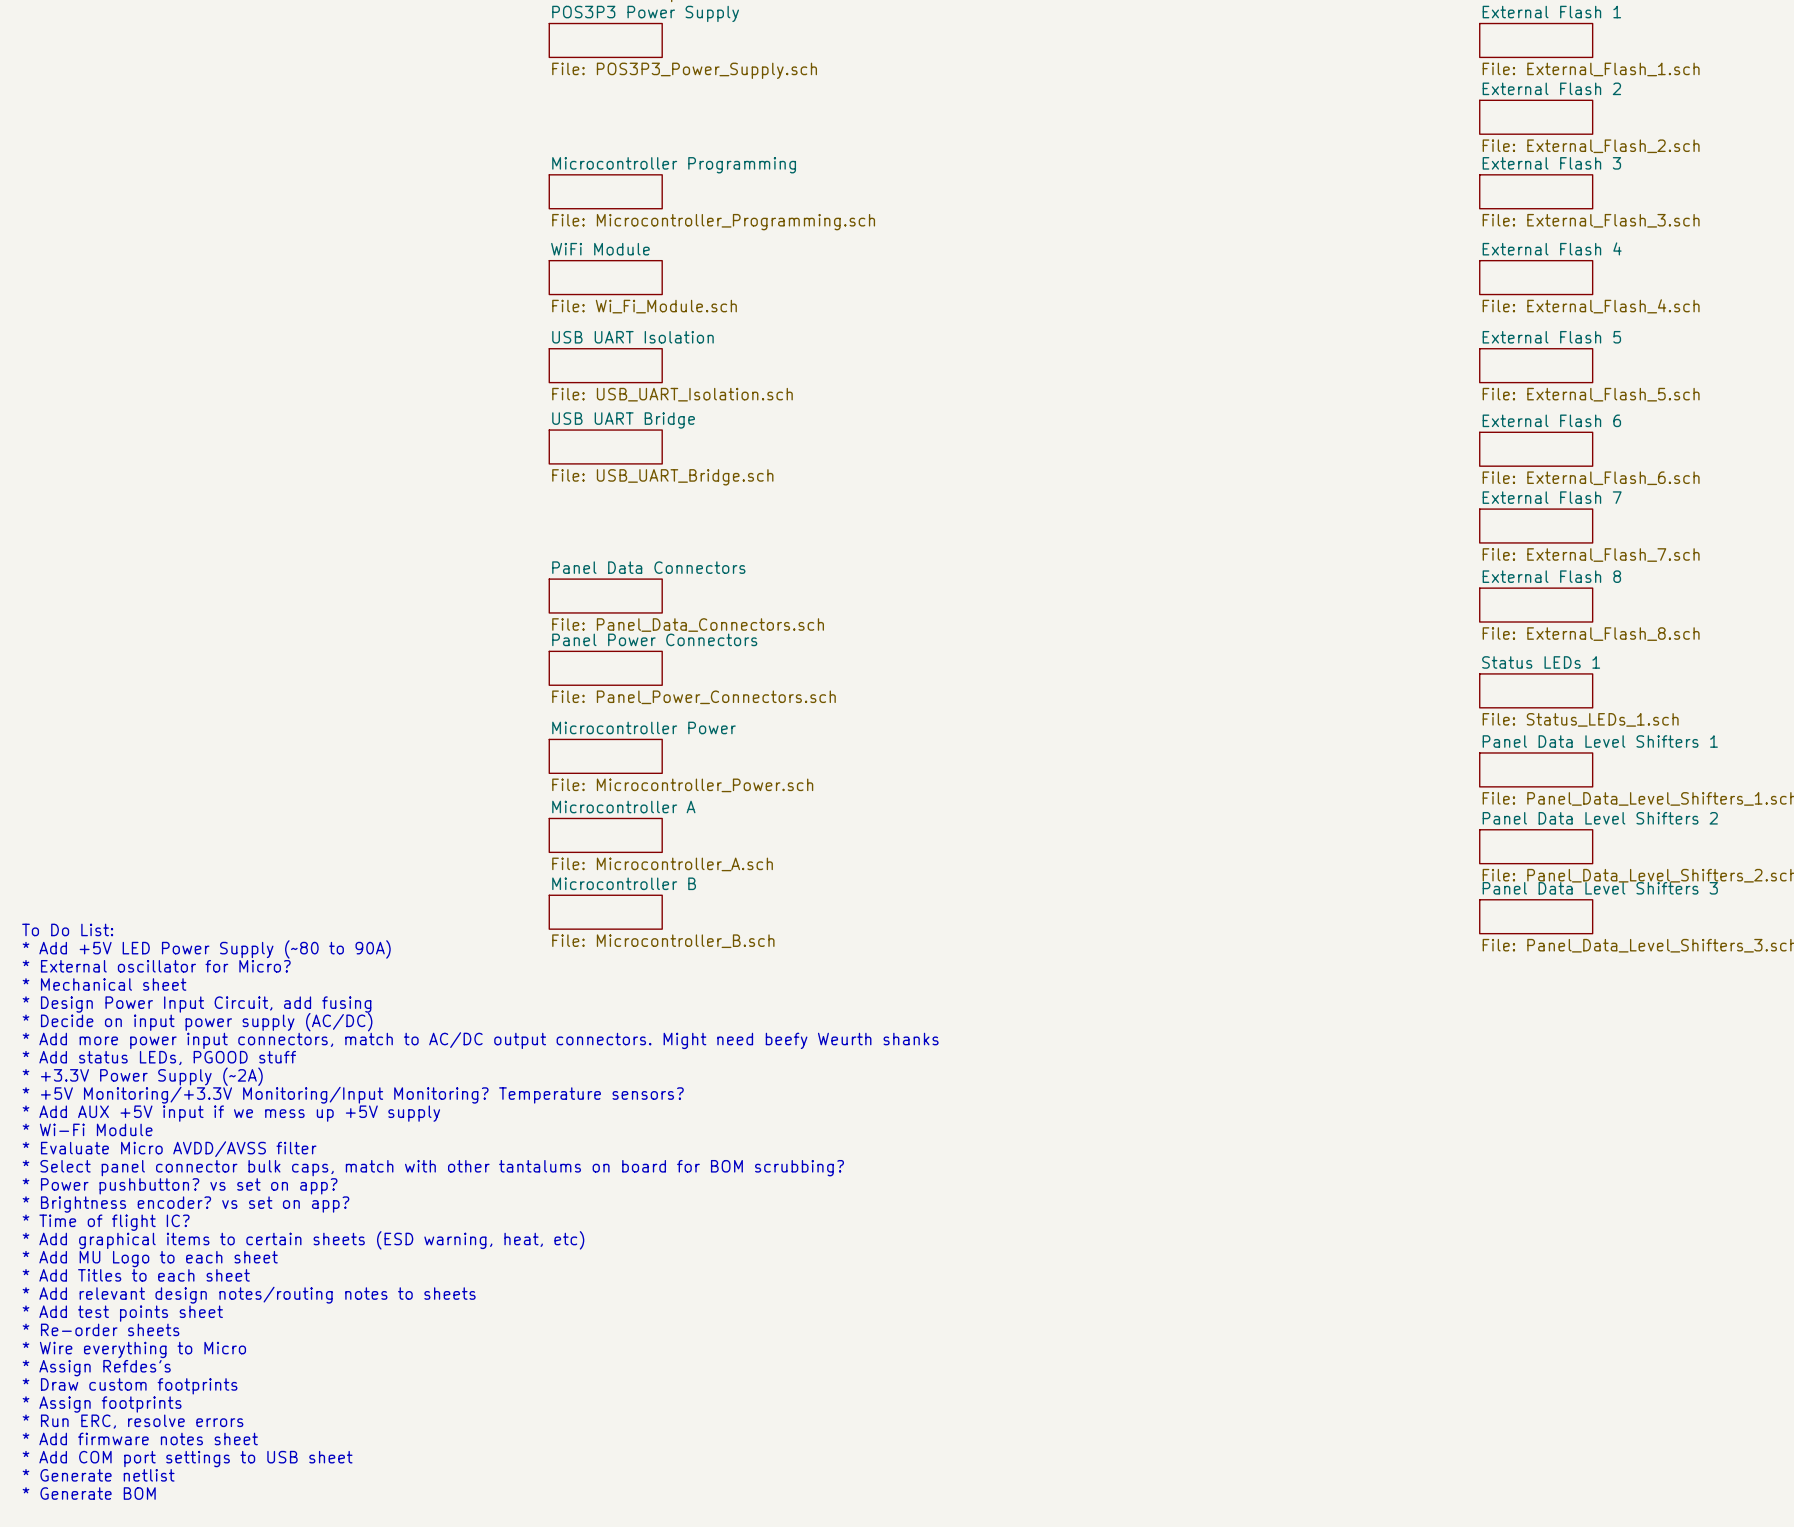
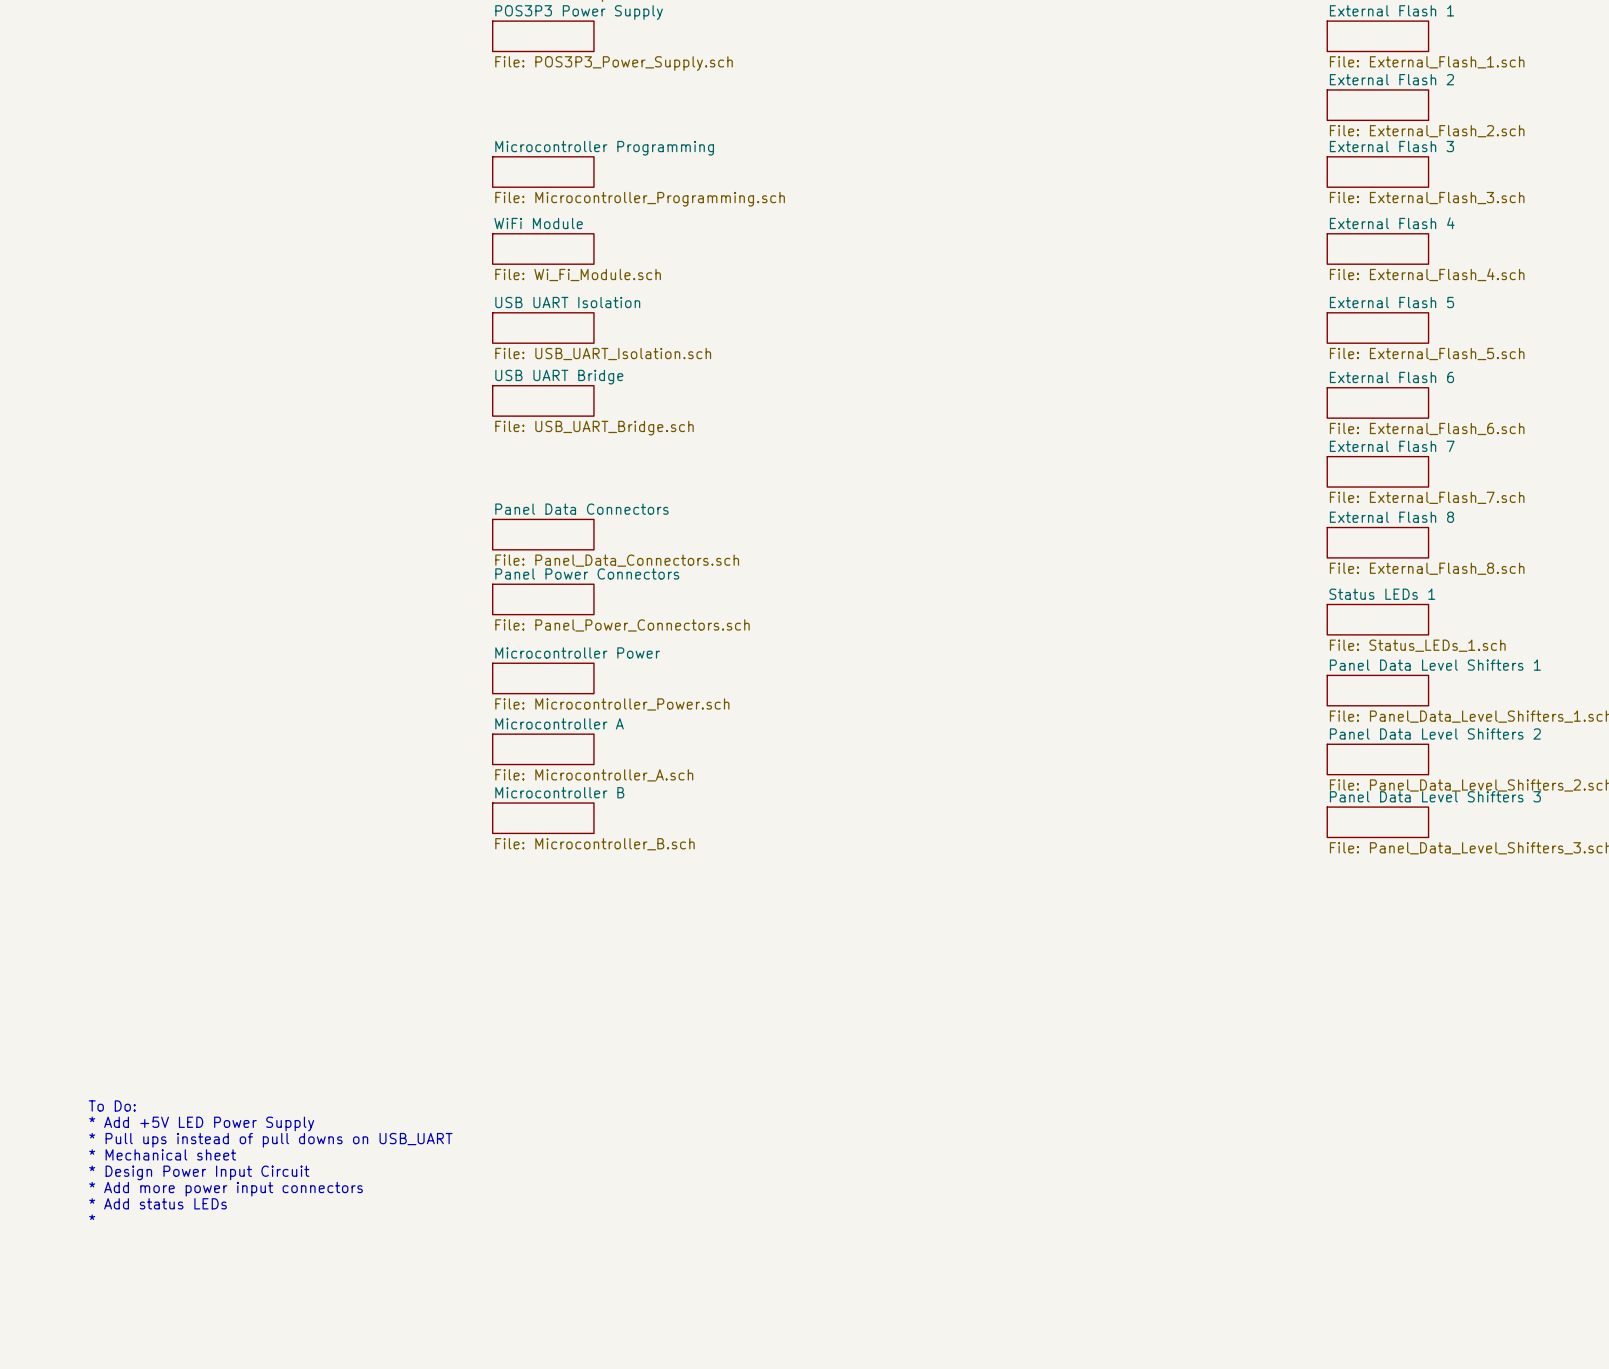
text: To Do List: (67, 929) -> none
text: * Add +5V LED Power Supply (~80 to 90A) (206, 949) -> none
text: * External oscillator for Micro? (156, 966) -> none
text: * Mechanical sheet (104, 984) -> none
text: * Design Power Input Circuit, add fusing (196, 1004) -> none
text: * Decide on input power supply (AC/DC) (197, 1022) -> none
text: * Add more power input connectors, match to AC/DC output connectors. Might need beefy Weurth shanks (480, 1040) -> none
text: * Add status LEDs, PGOOD stuff (159, 1058) -> none
text: * +3.3V Power Supply (~2A) (142, 1076) -> none
text: * +5V Monitoring/+3.3V Monitoring/Input Monitoring? Temperature sensors? (353, 1095) -> none
text: * Add AUX +5V input if we mess up +5V supply (231, 1113) -> none
text: * Wi-Fi Module (87, 1129) -> none
text: * Evaluate Micro AVDD/AVSS filter (169, 1149) -> none
text: * Select panel connector bulk caps, match with other tantalums on board for BOM scrubbing? (433, 1168) -> none
text: * Power pushbutton? vs set on app? (180, 1186) -> none
text: * Brightness encoder? vs set on app? (185, 1204) -> none
text: * Time of flight IC? (106, 1222) -> none
text: none -> To Do: (112, 1105)
text: * Add graphical items to certain sheets (ESD warning, heat, etc) (303, 1240) -> none
text: none -> * Add +5V LED Power Supply (201, 1123)
text: * Add MU Logo to each sheet (150, 1259) -> none
text: none -> * Pull ups instead of pull downs on USB_UART (270, 1140)
text: * Add Titles to each sheet (136, 1275) -> none
text: none -> * Mechanical sheet (162, 1154)
text: * Add relevant design notes/routing notes to sheets (249, 1295) -> none
text: none -> * Design Power Input Circuit (199, 1172)
text: * Add test points sheet (122, 1313) -> none
text: none -> * Add more power input connectors (226, 1189)
text: * Re-order sheets (101, 1329) -> none
text: none -> * Add status LEDs (158, 1203)
text: * Wire everything to Micro (134, 1349) -> none
text: none -> * (92, 1217)
text: * Assign Refdes's (96, 1368) -> none
text: * Draw custom footprints (130, 1386) -> none
text: * Assign footprints (102, 1404) -> none
text: * Run ERC, resolve errors (133, 1421) -> none
text: * Add firmware notes sheet (140, 1438) -> none
text: * Add COM port settings to USB sheet (187, 1459) -> none
text: * Generate netlist (98, 1475) -> none
text: * Generate BOM (89, 1493) -> none

